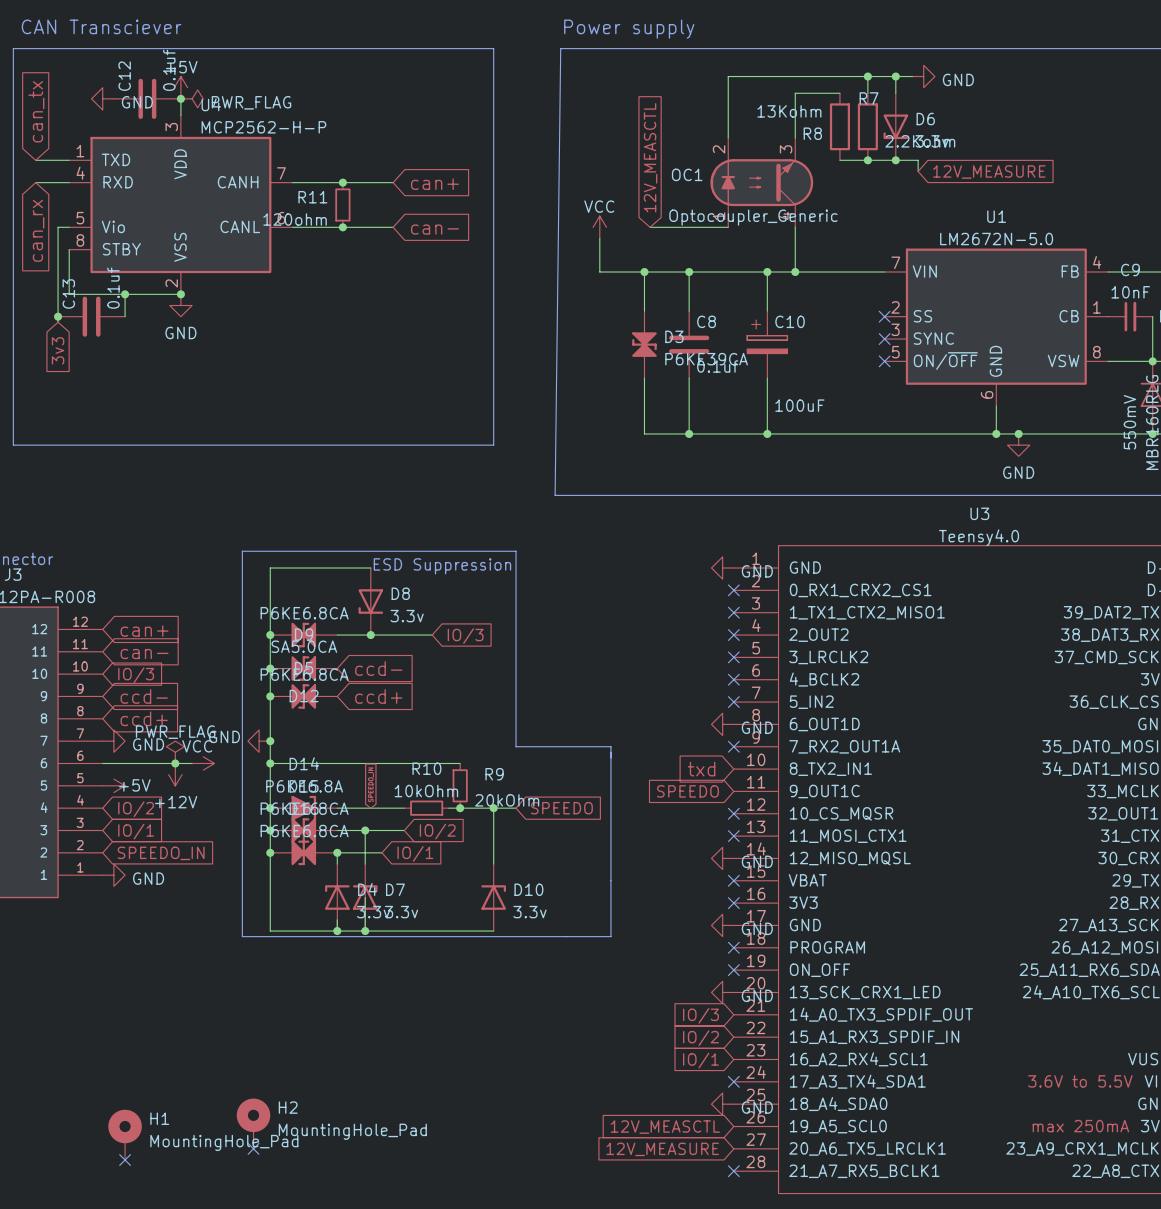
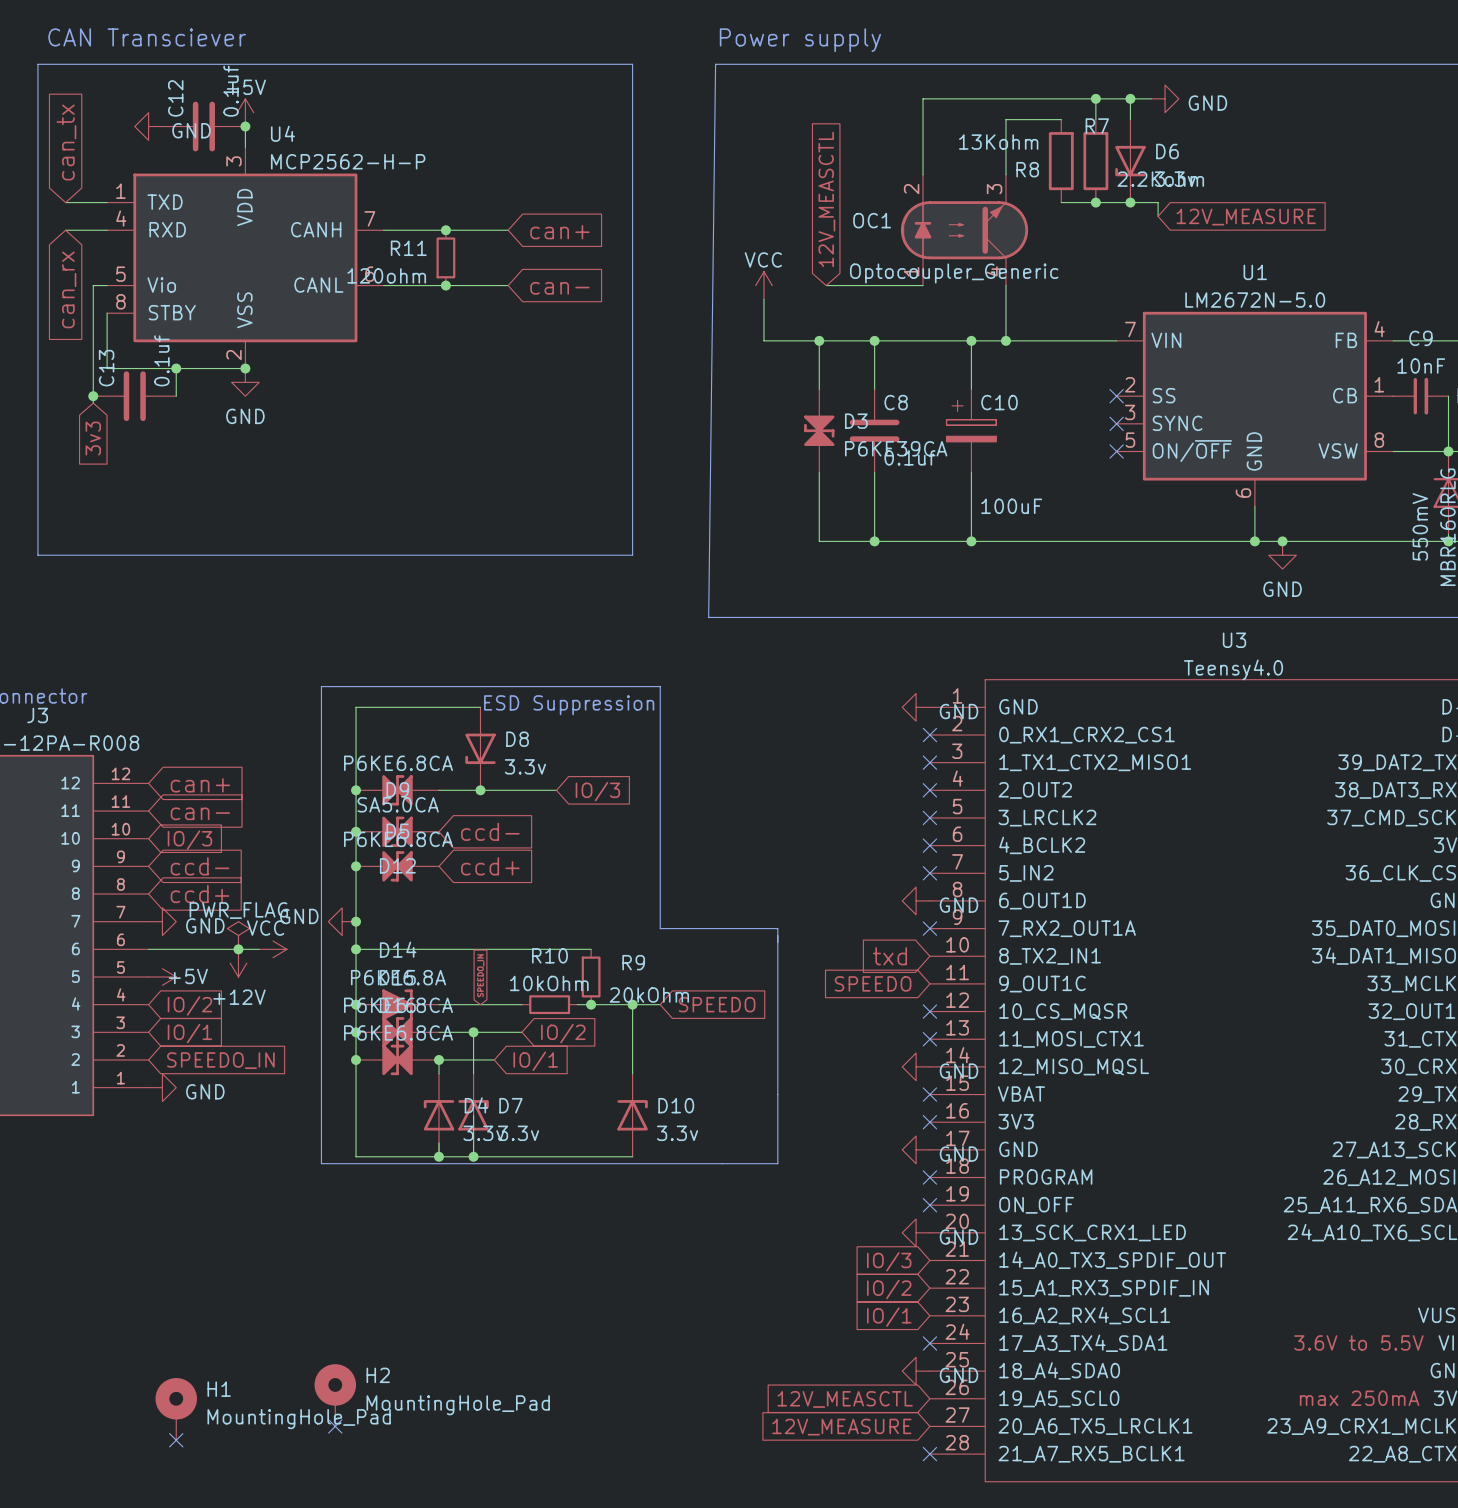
power symbol: PWR_FLAG (192, 98) -> none

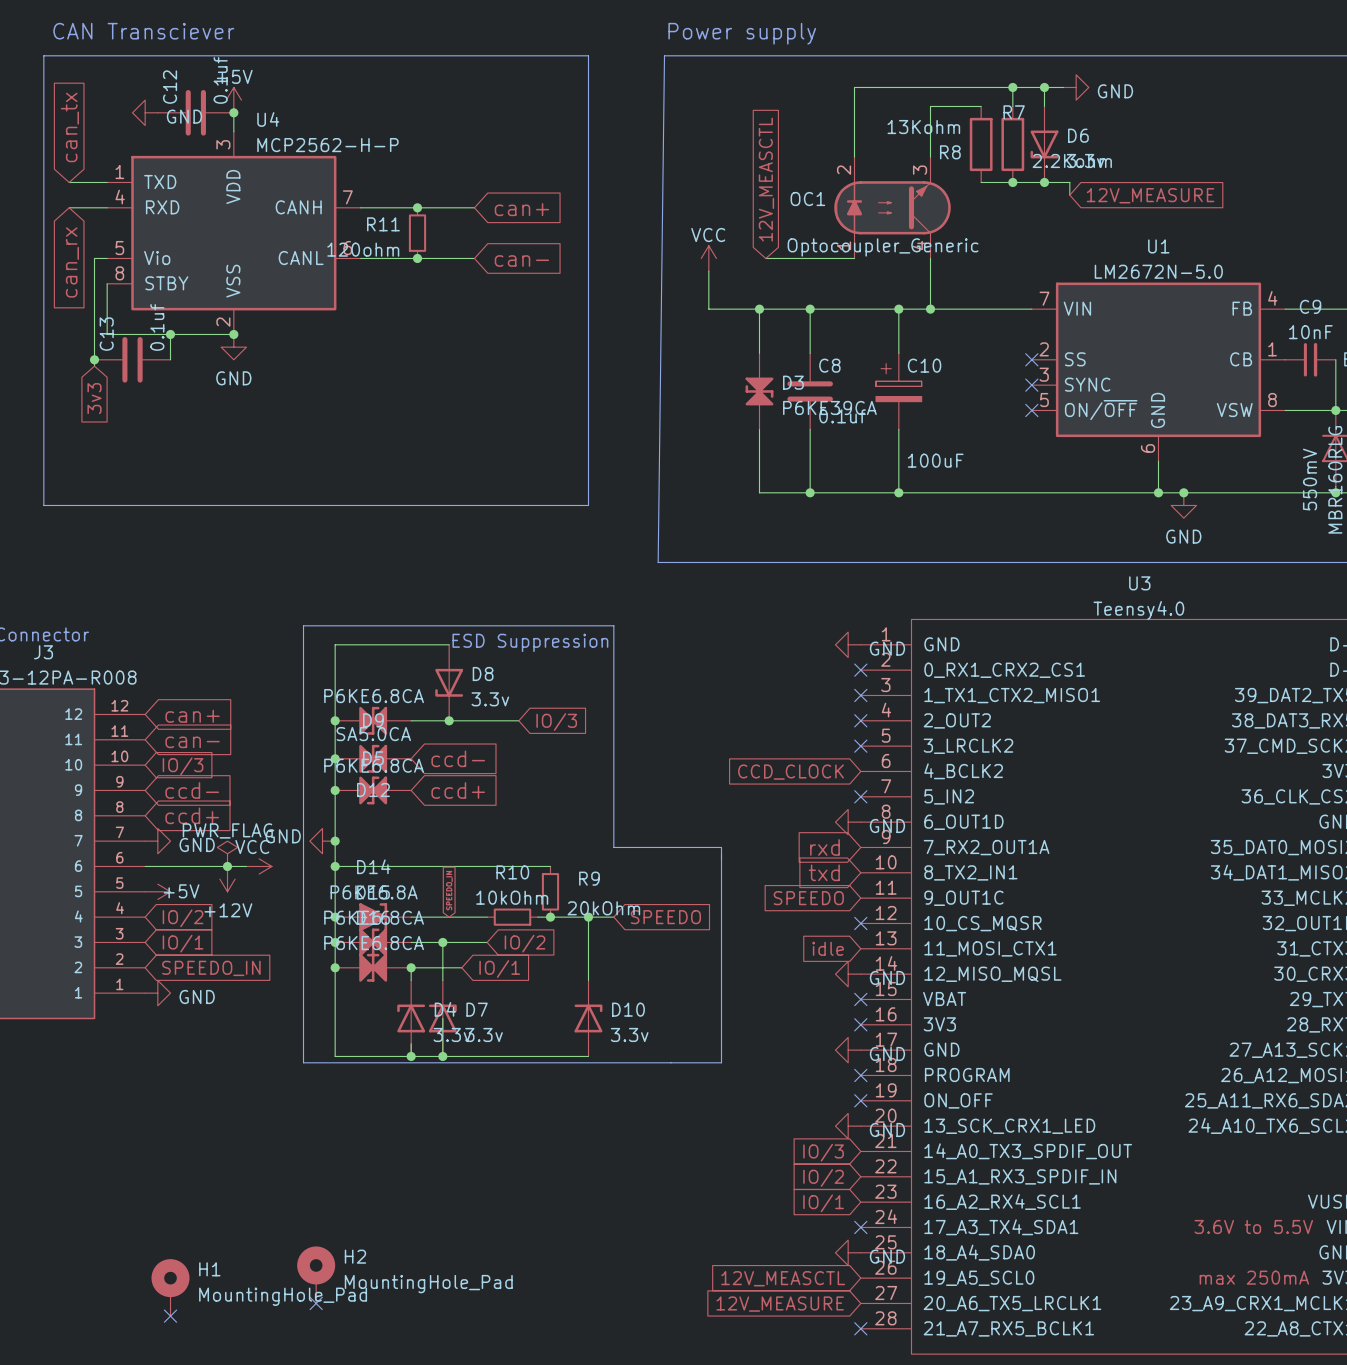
no-connect mark: (929, 845) -> none
global label: none -> CCD_CLOCK (790, 772)
global label: none -> rxd (824, 847)
no-connect mark: (929, 928) -> none
global label: none -> idle (828, 948)
no-connect mark: (929, 1039) -> none

